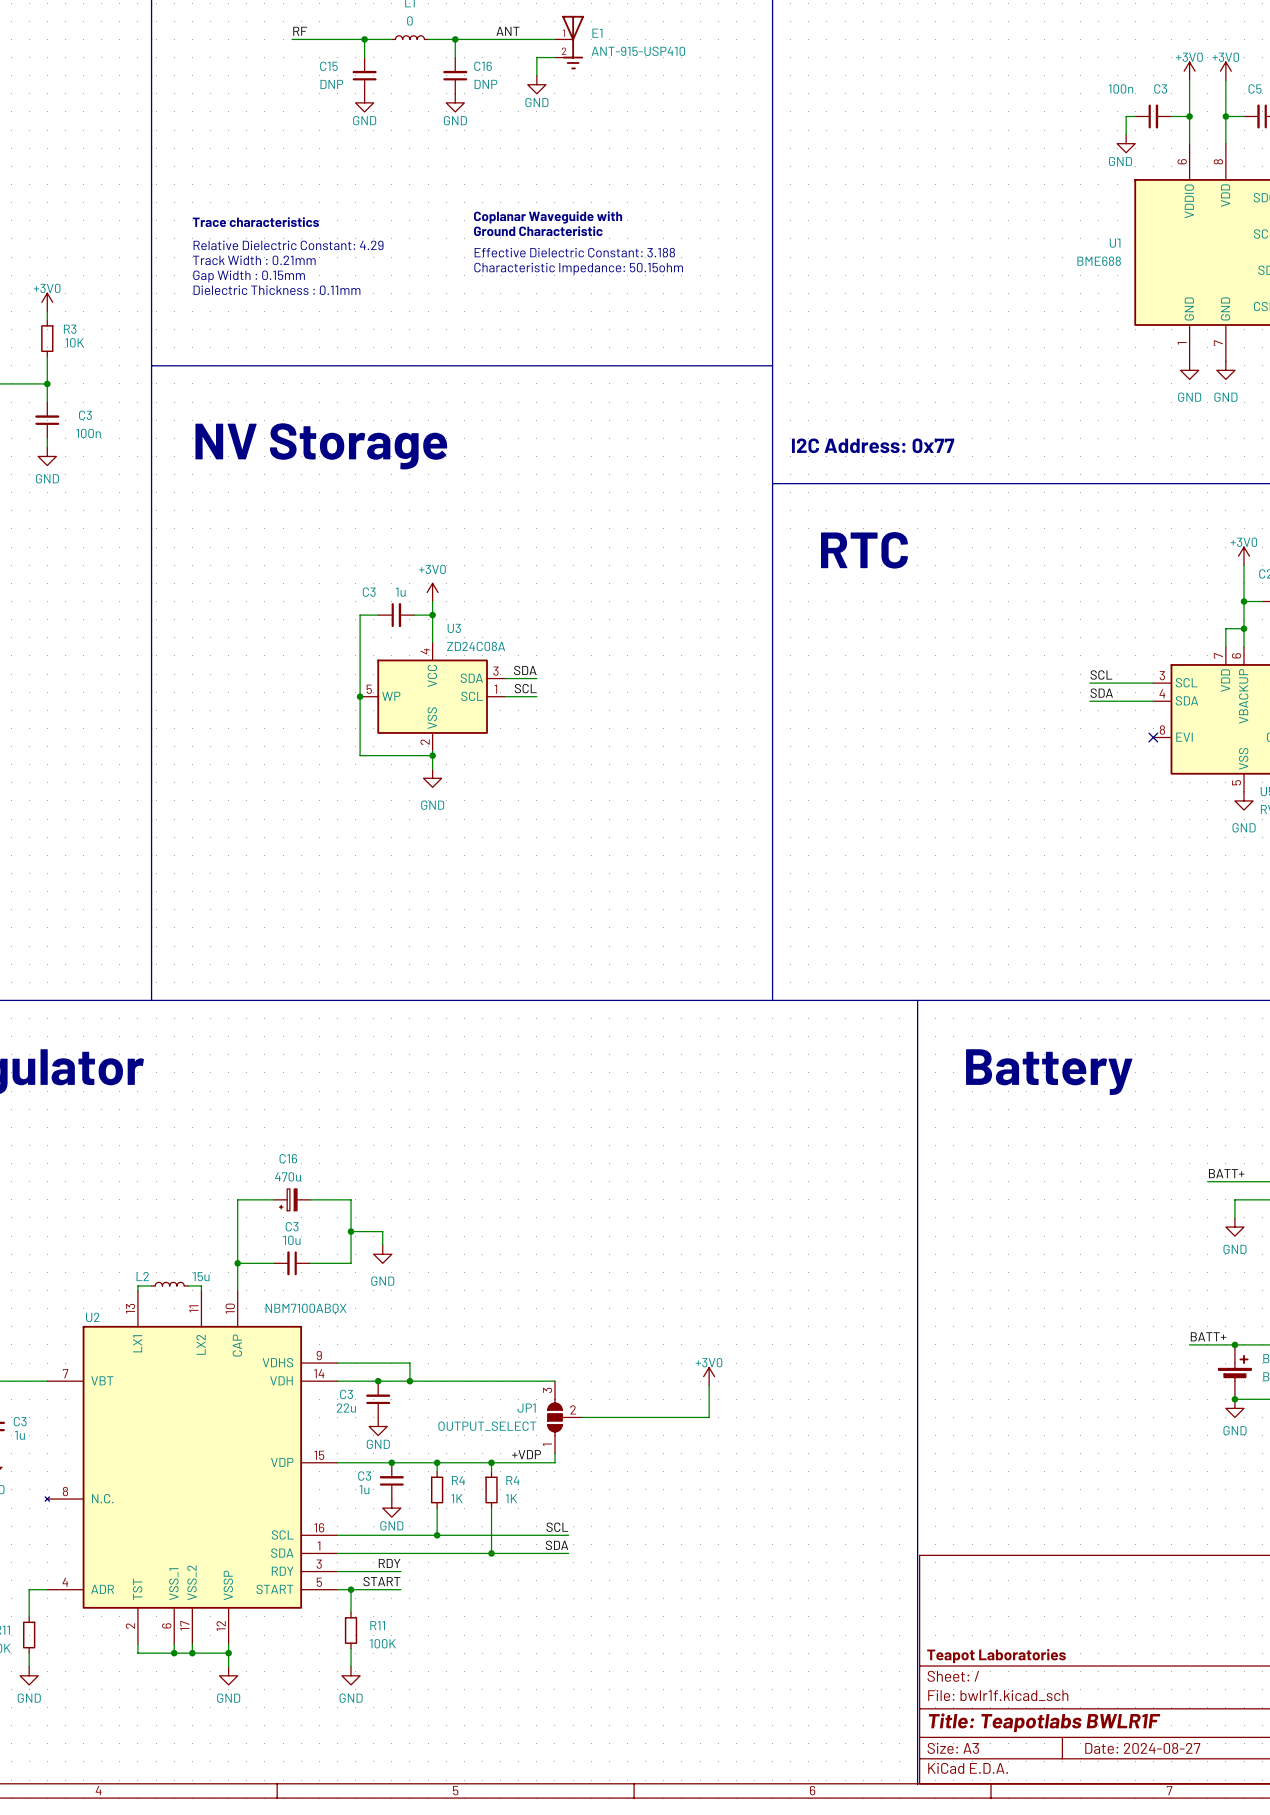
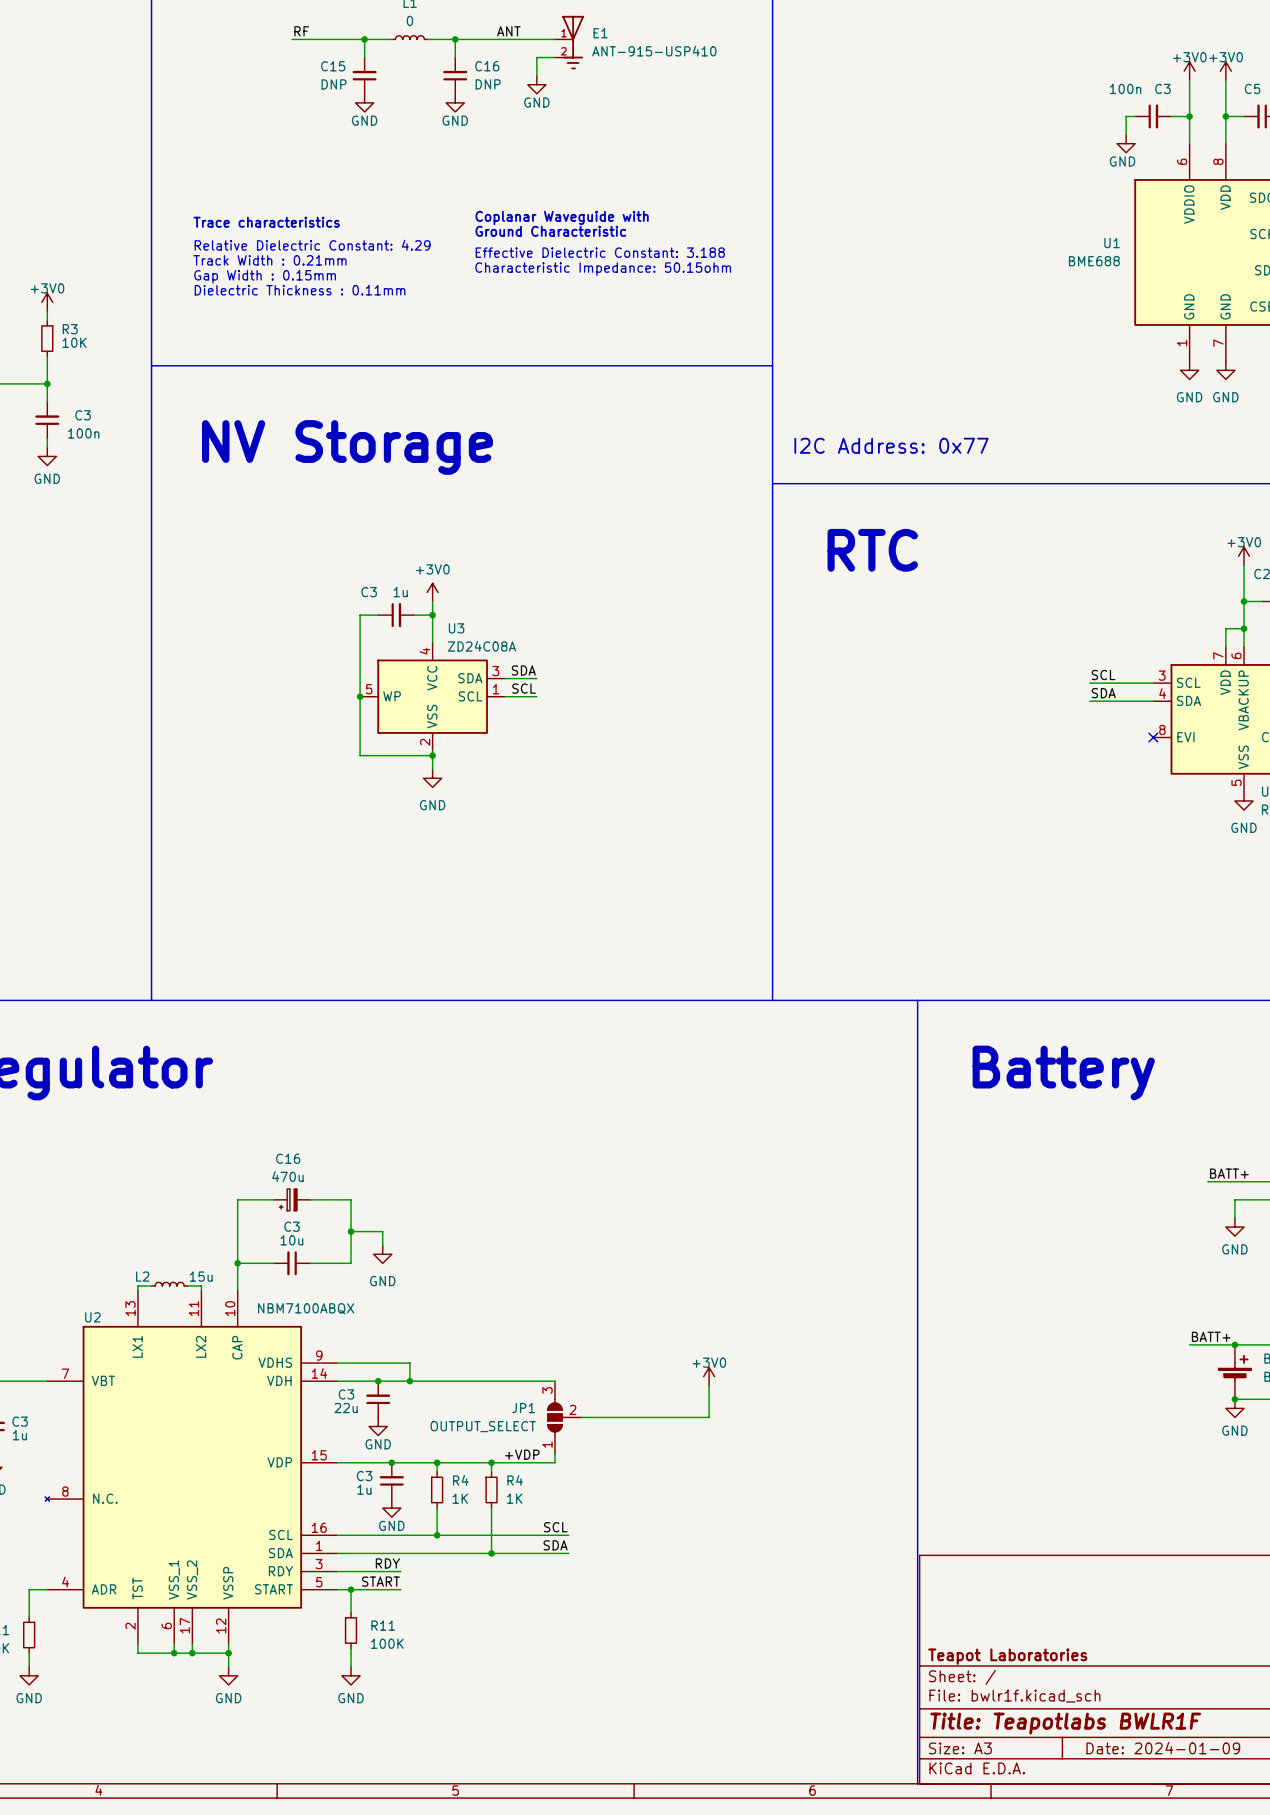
title block: Date: 2024-08-27 (1142, 1748) -> Date: 2024-01-09 (1163, 1748)

